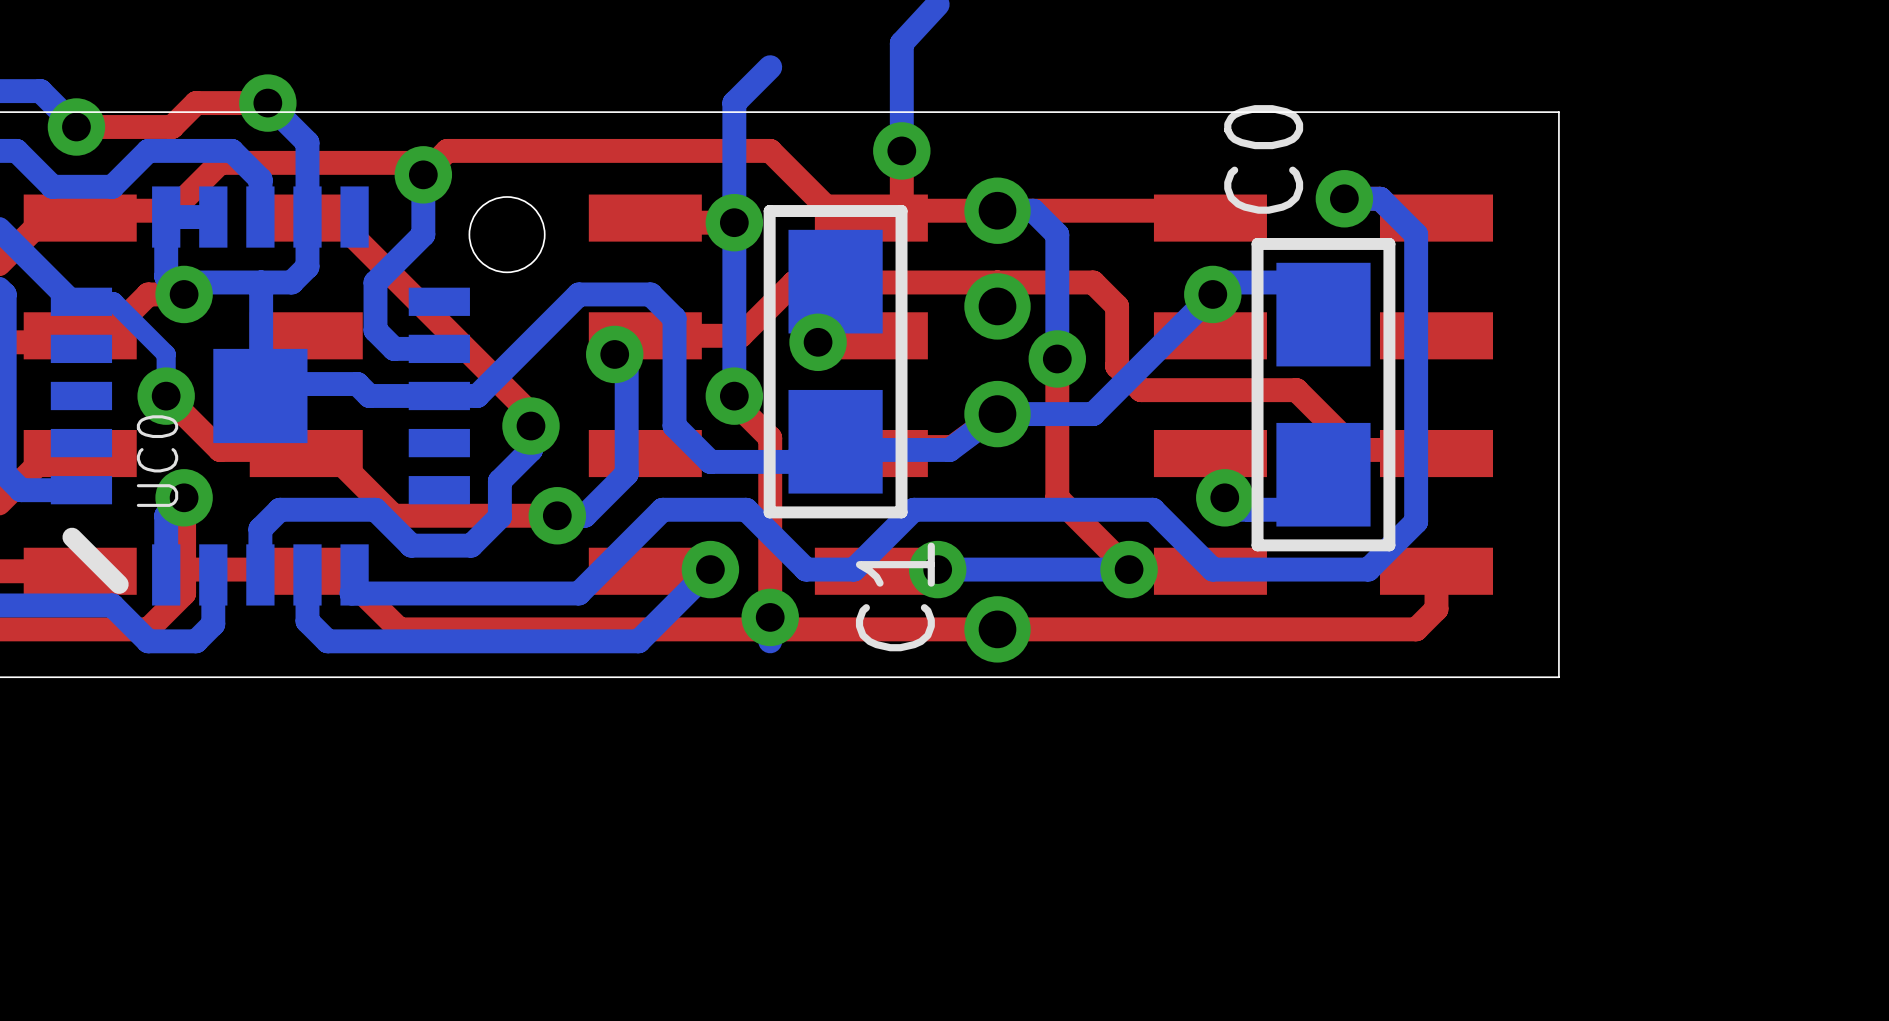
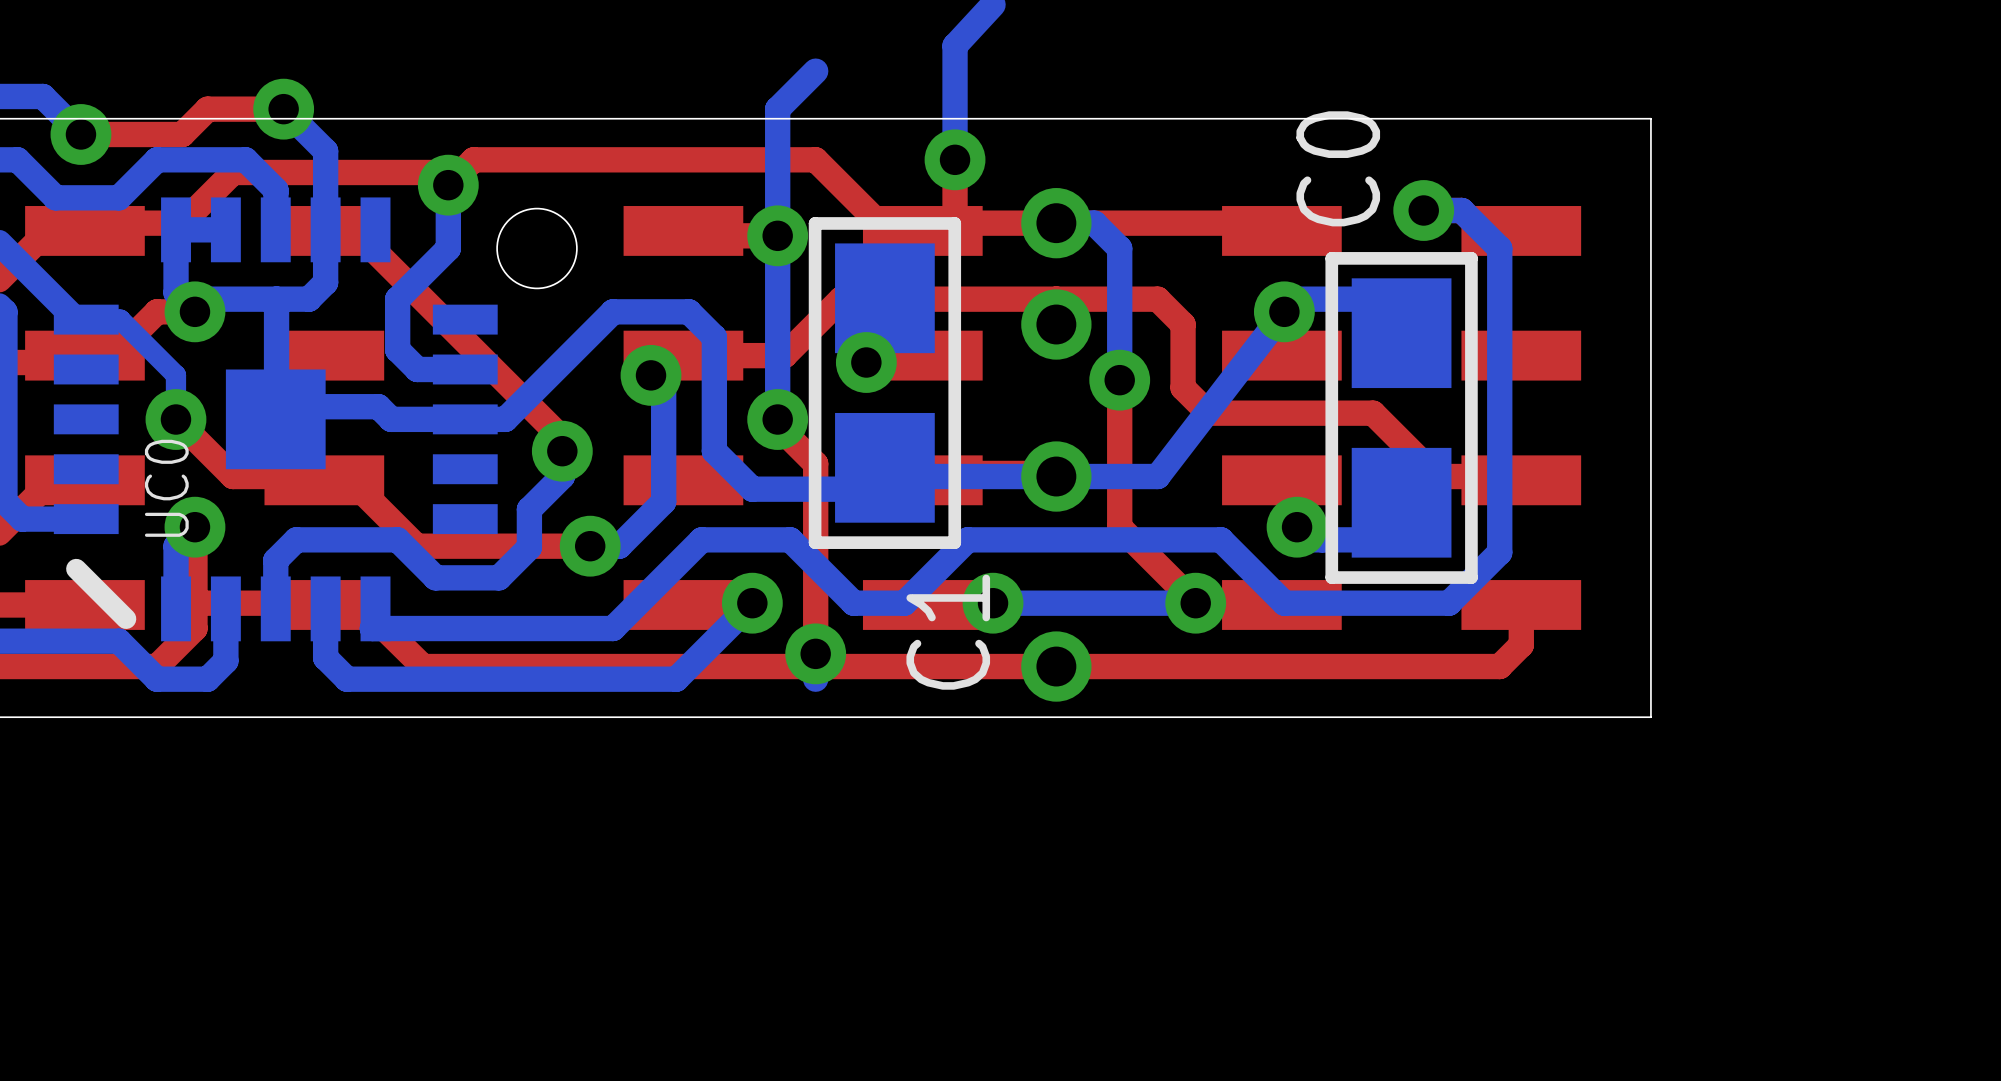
bottom track: (1212, 294) (1093, 414) (997, 414) (949, 449) -> (1284, 311) (1157, 476) (1005, 476)
via position: (997, 414) -> (1056, 476)

